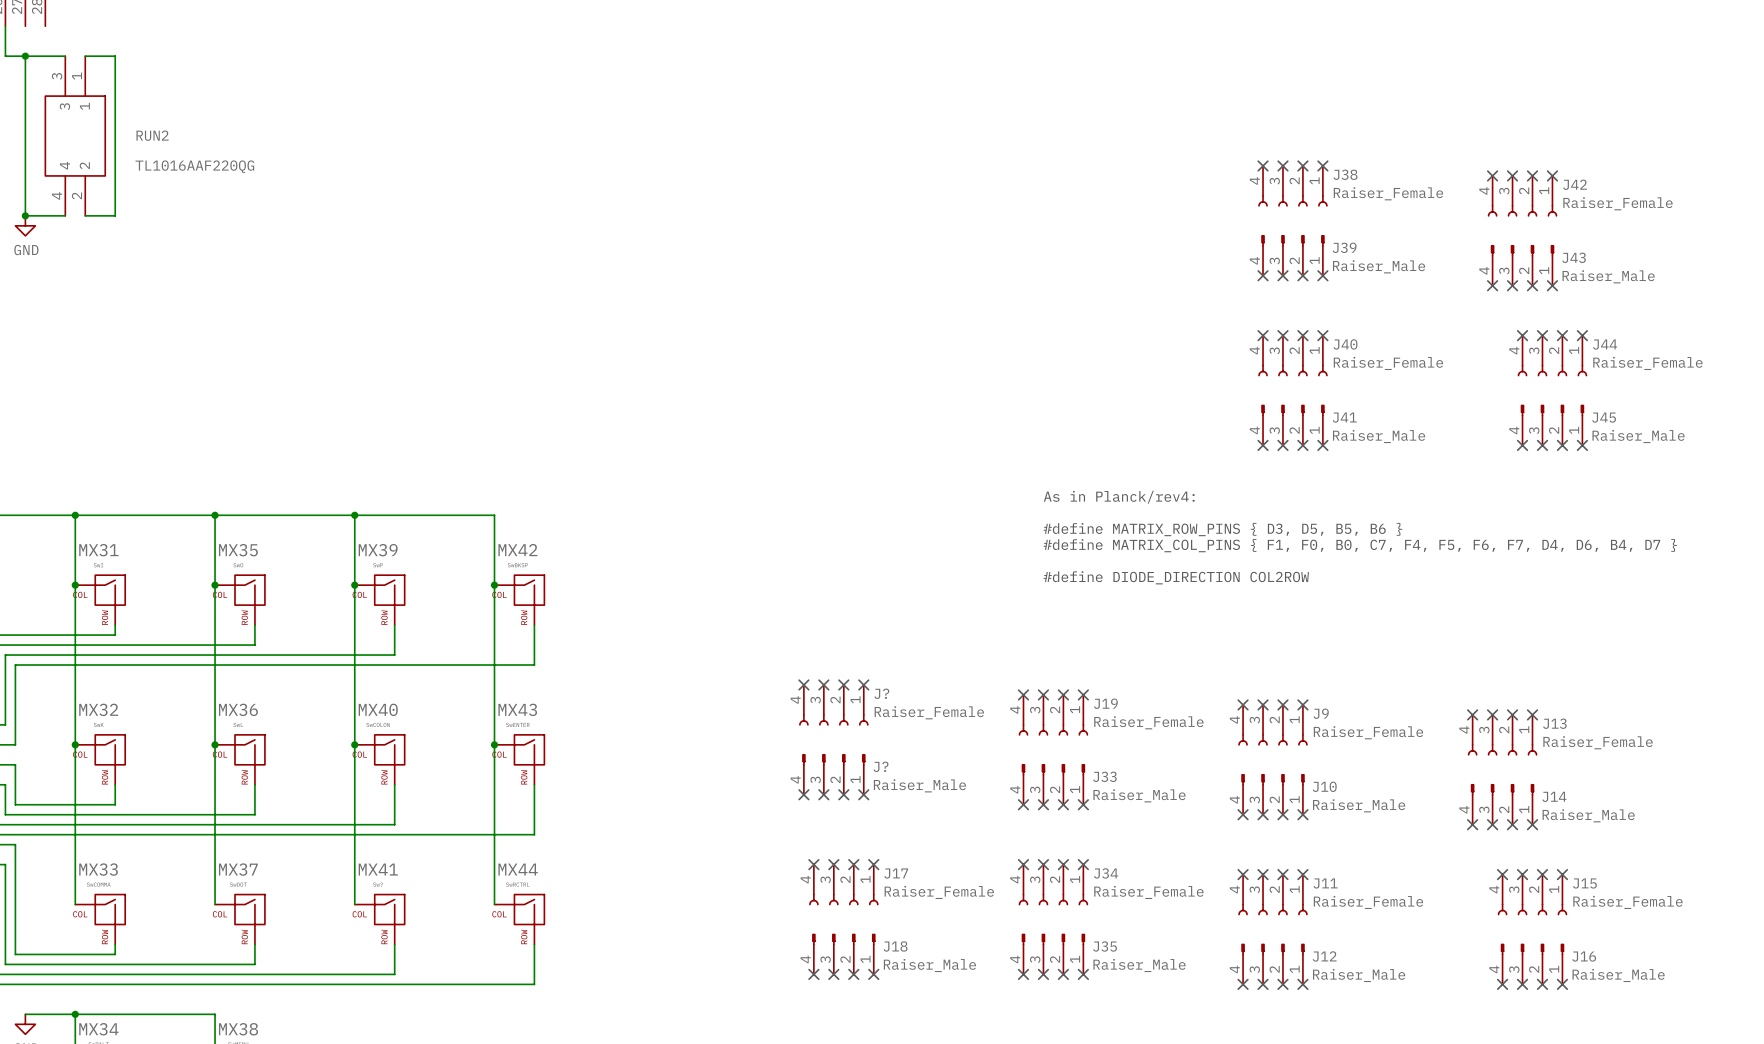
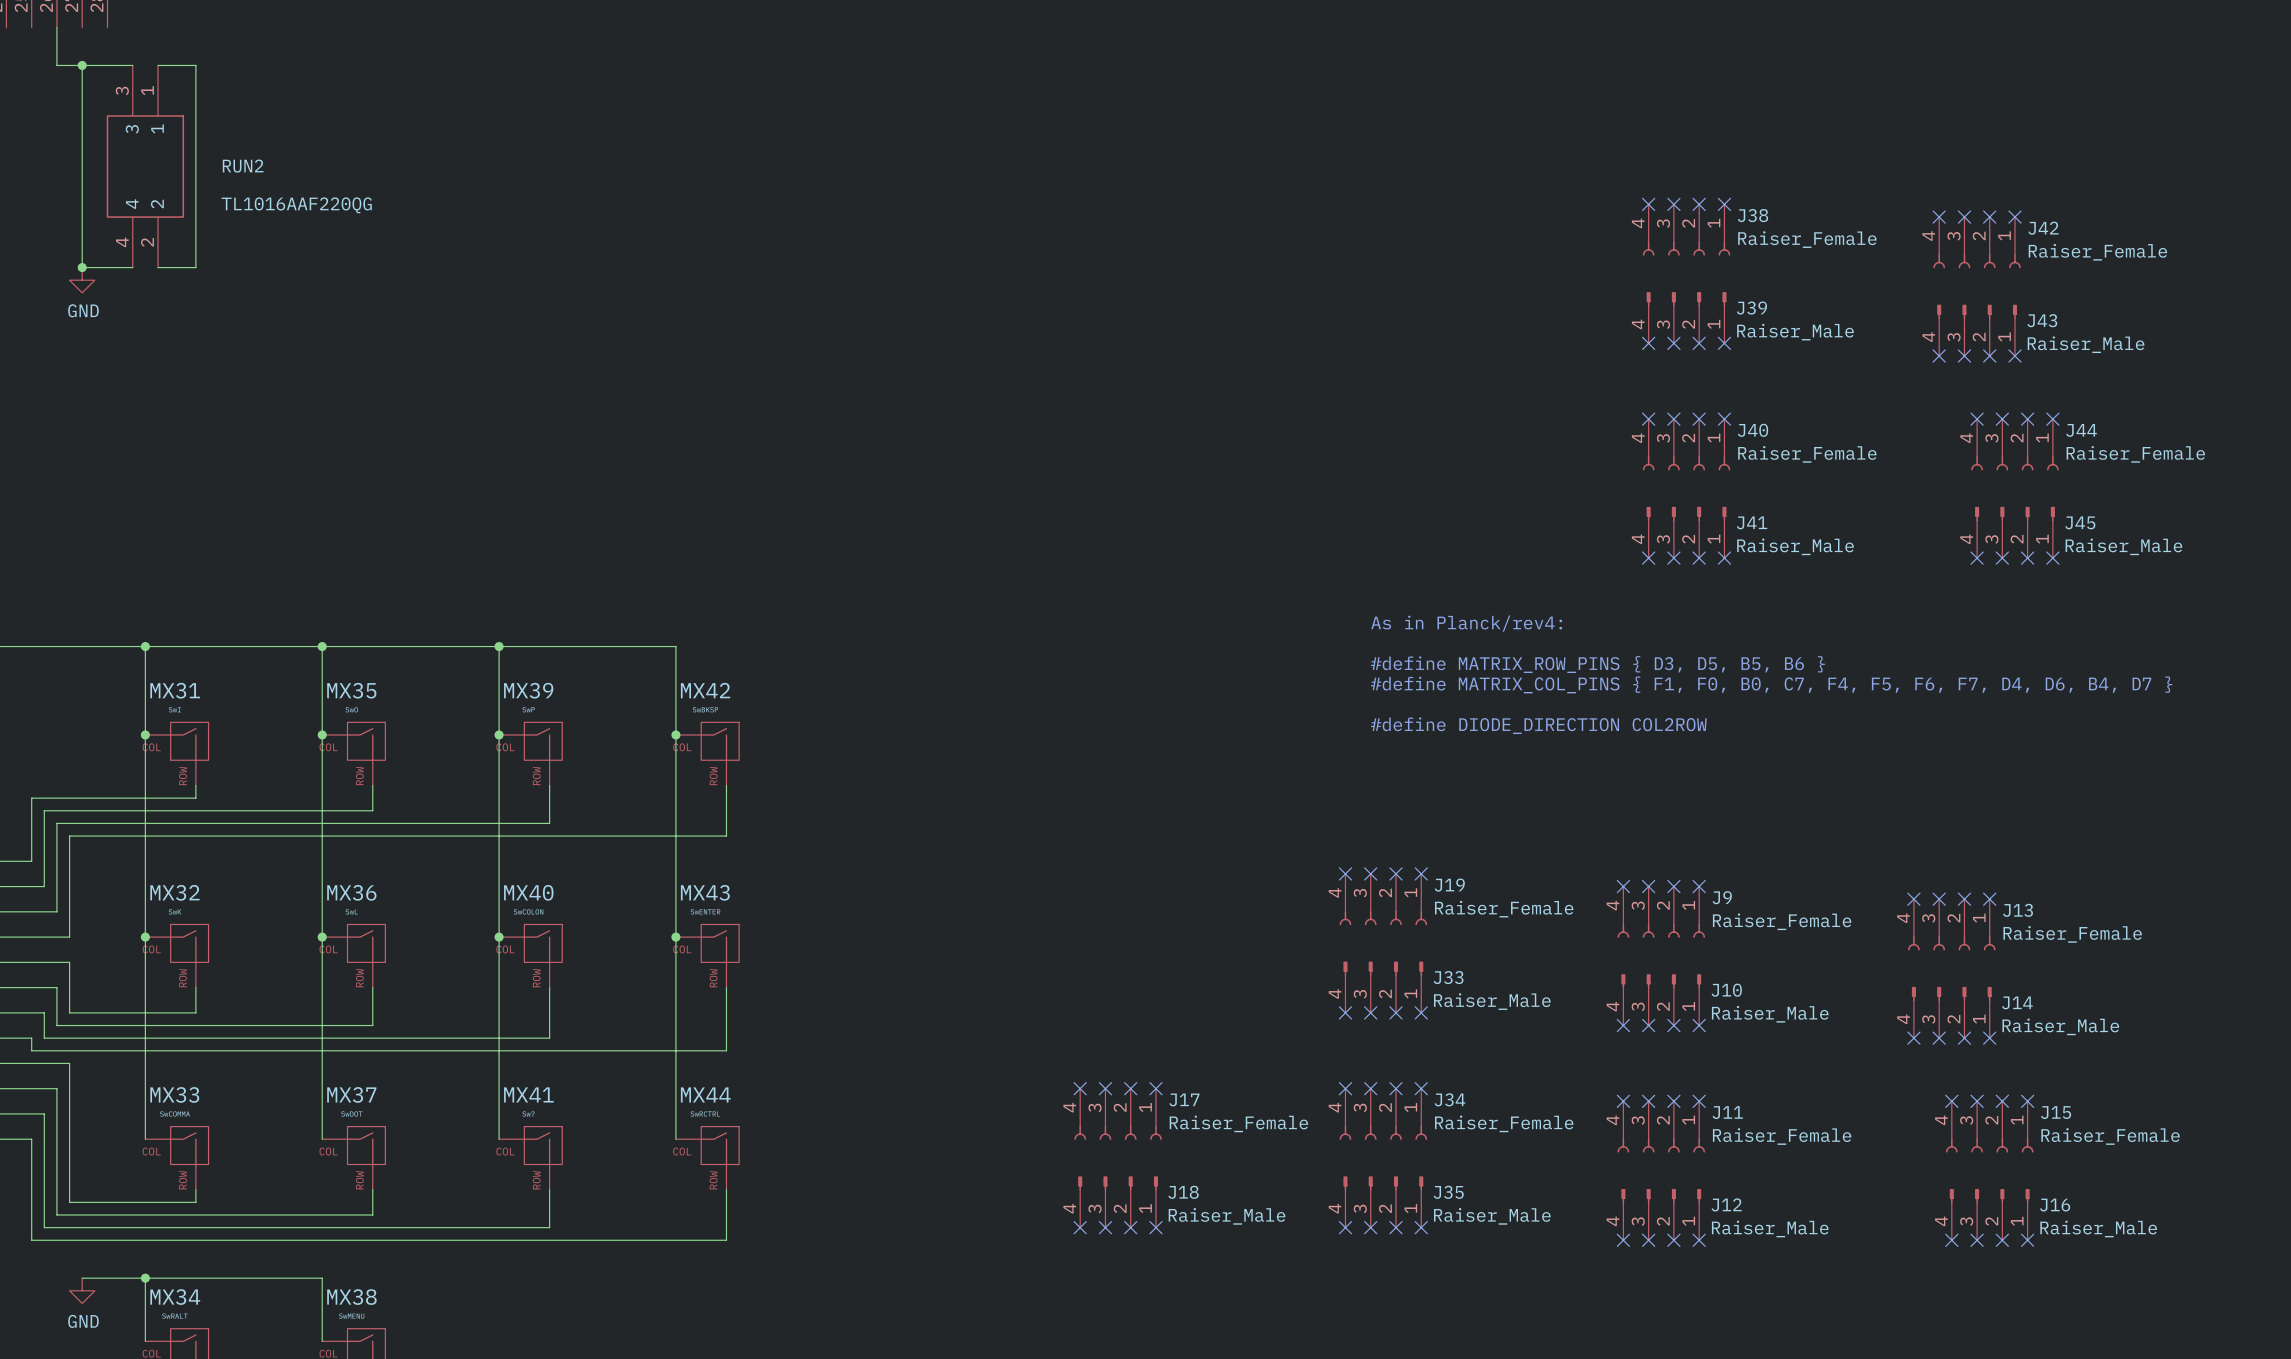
no-connect mark: (803, 684) -> none
no-connect mark: (823, 684) -> none
no-connect mark: (843, 684) -> none
no-connect mark: (863, 684) -> none
J?: Raiser_Female (833, 705) -> none
J?: Raiser_Male (833, 774) -> none
no-connect mark: (803, 794) -> none
no-connect mark: (823, 794) -> none
no-connect mark: (843, 794) -> none
no-connect mark: (863, 794) -> none

